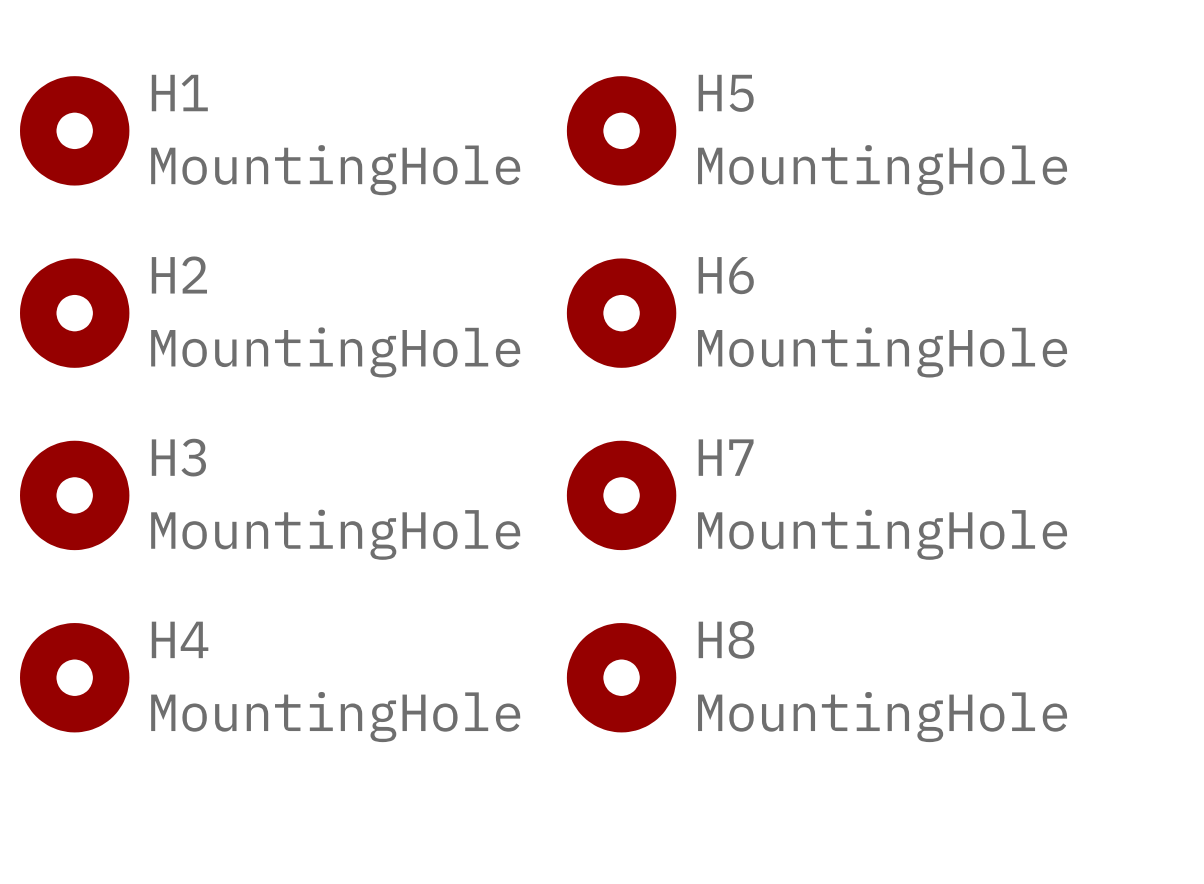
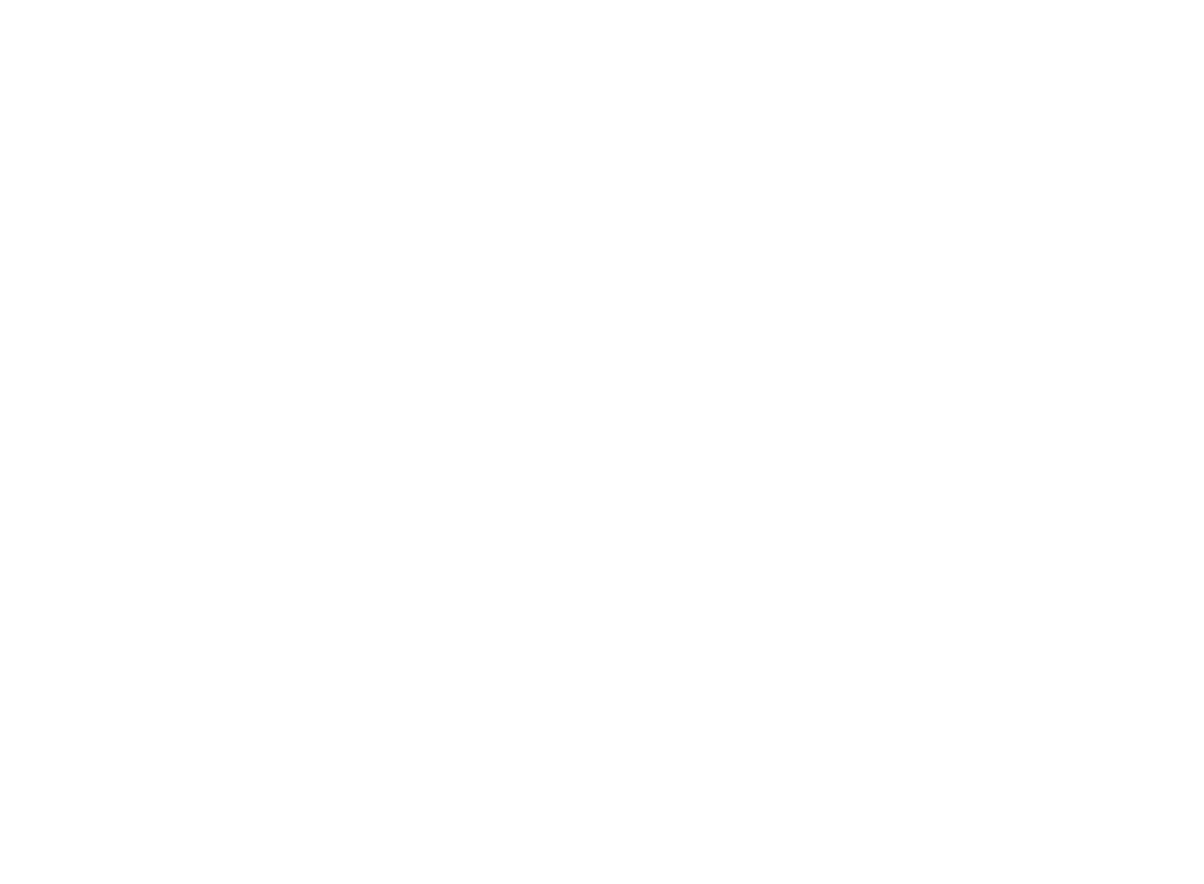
H1: MountingHole (74, 130) -> none
H5: MountingHole (621, 130) -> none
H2: MountingHole (74, 313) -> none
H6: MountingHole (621, 313) -> none
H3: MountingHole (74, 495) -> none
H7: MountingHole (621, 495) -> none
H4: MountingHole (74, 677) -> none
H8: MountingHole (621, 677) -> none

